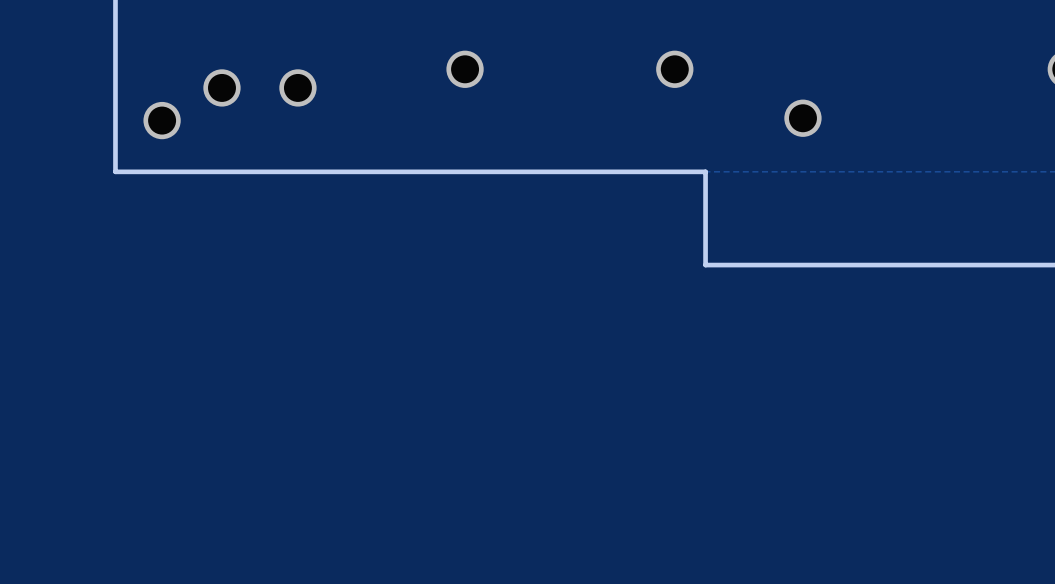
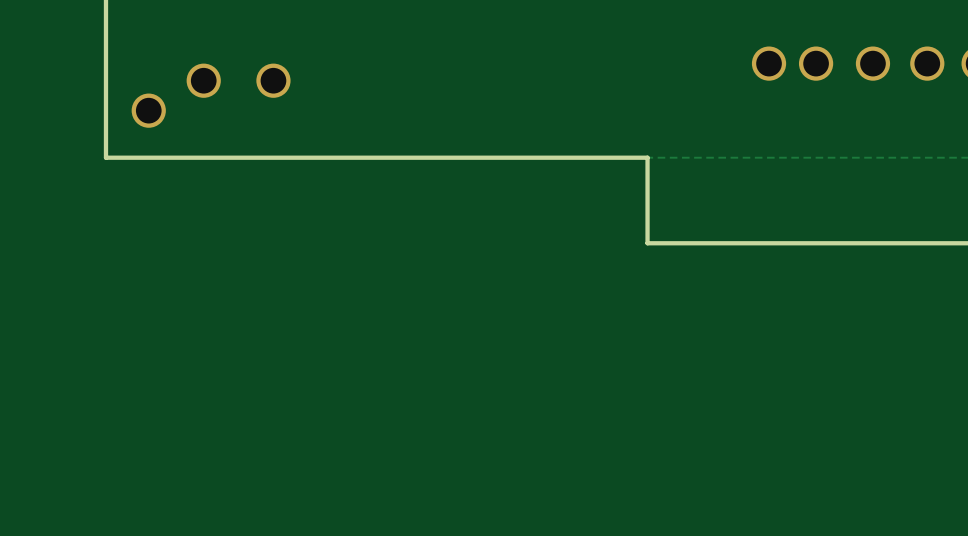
via: (465, 69) -> none
via: (674, 69) -> none
via: none -> (769, 63)
via: none -> (816, 63)
via: none -> (872, 63)
via: none -> (927, 63)
via: (802, 118) -> none

